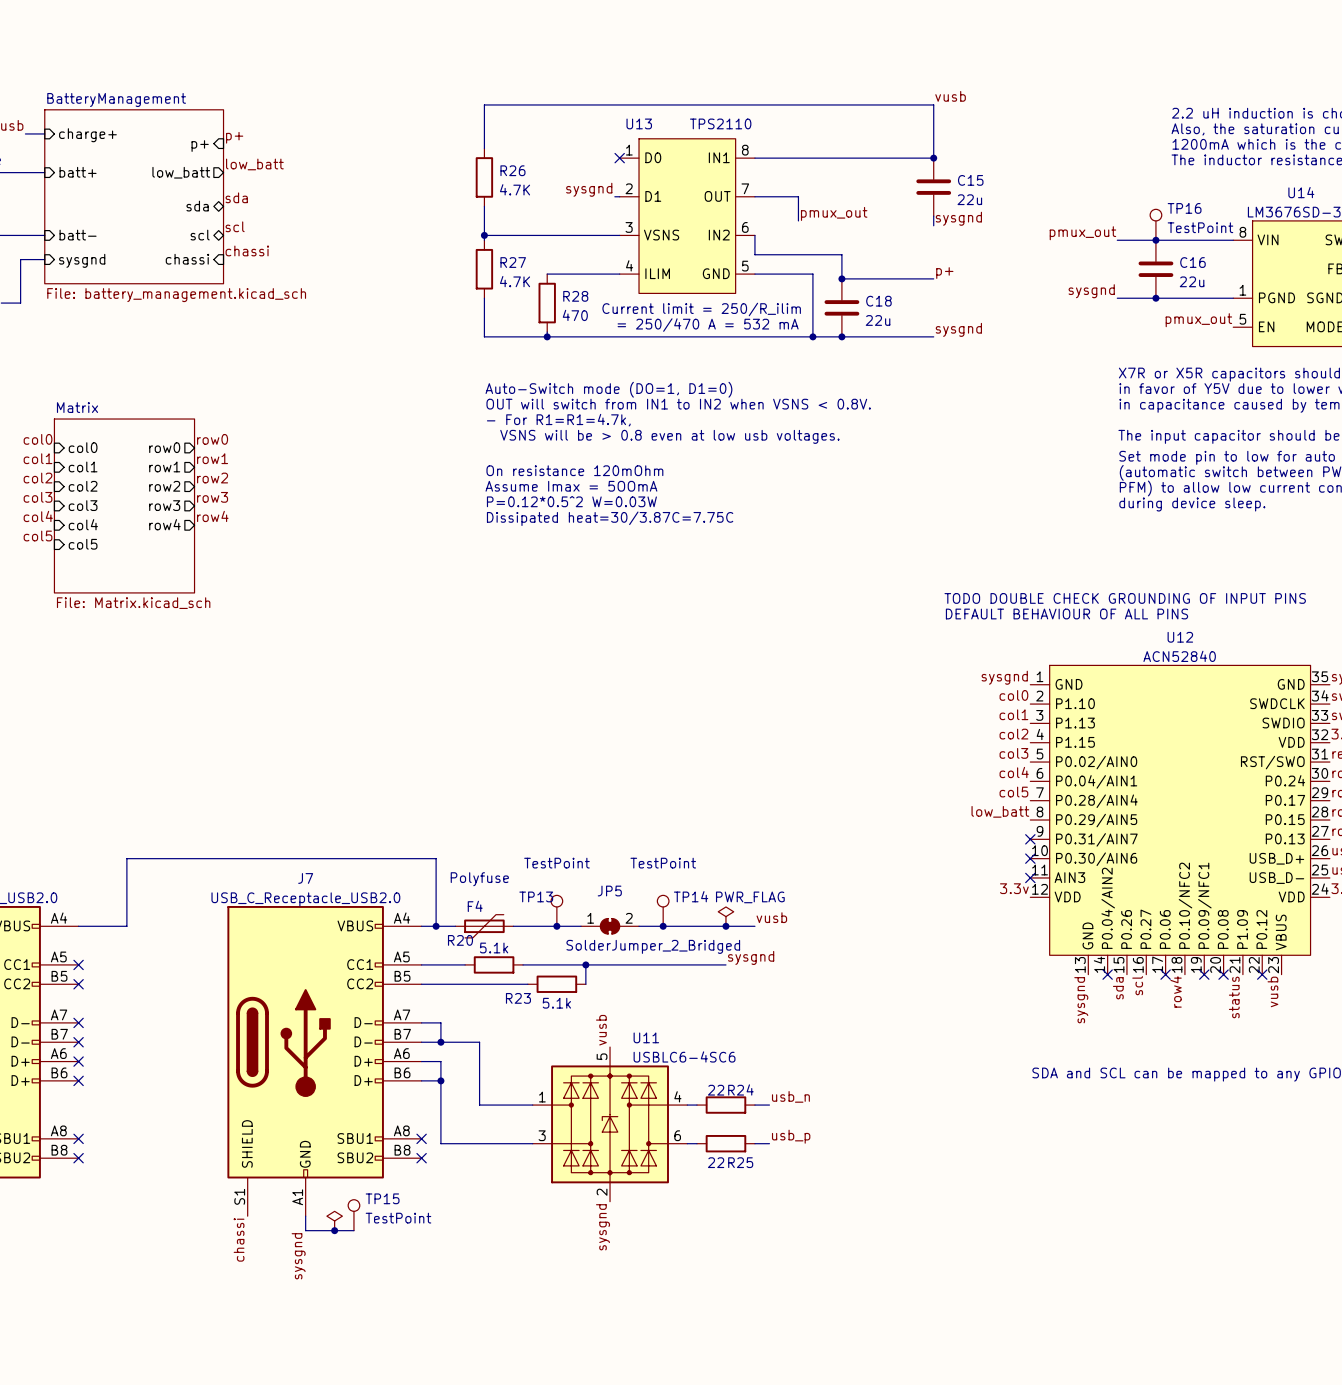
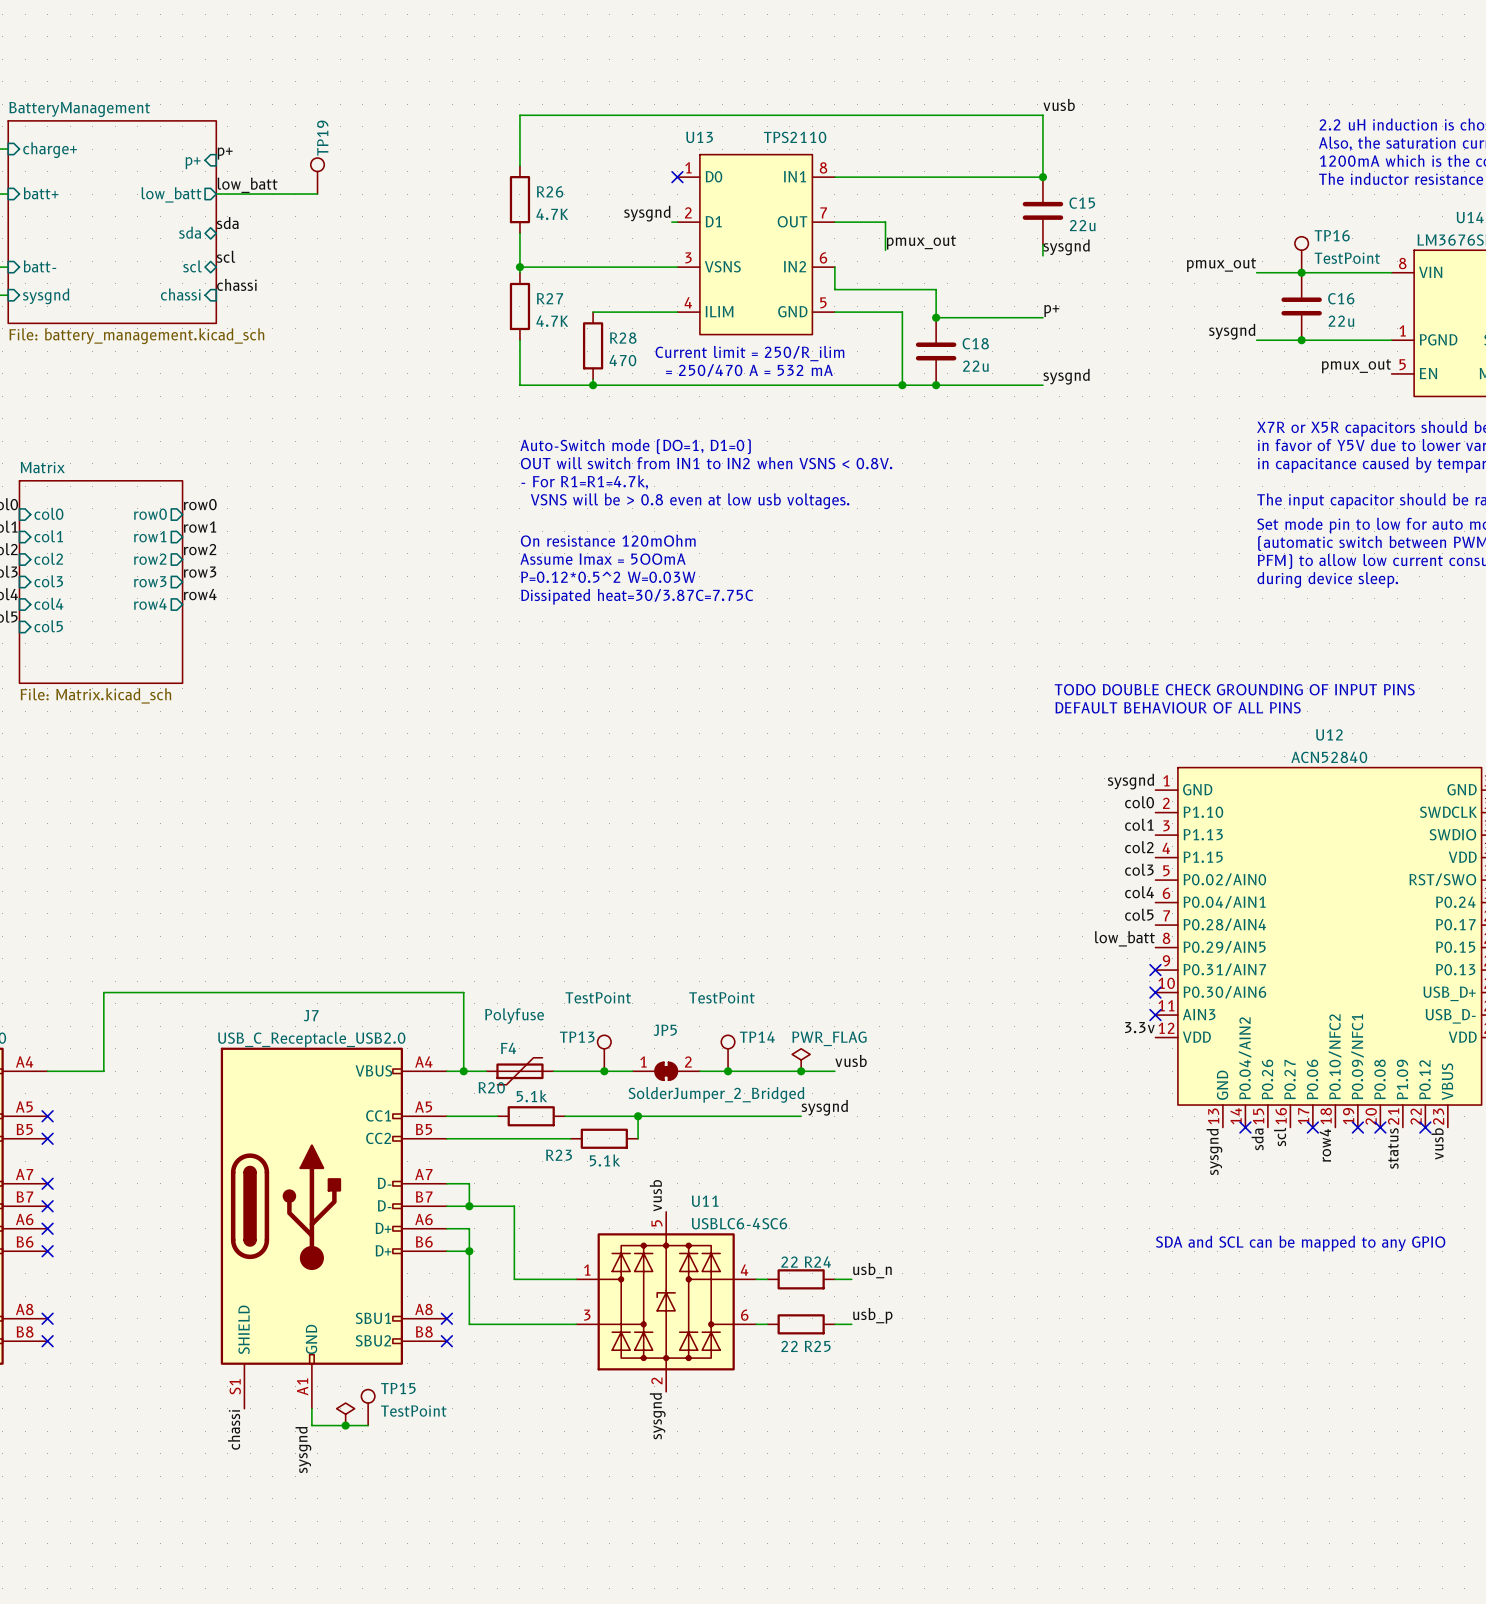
TP19: none -> (317, 176)
wire: none -> (216, 194) (317, 194)

